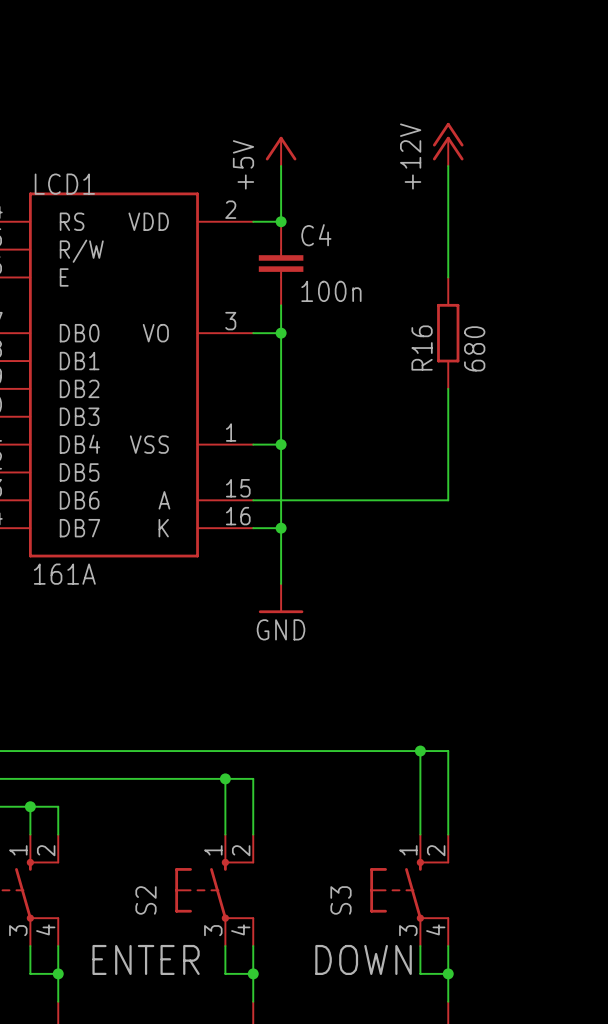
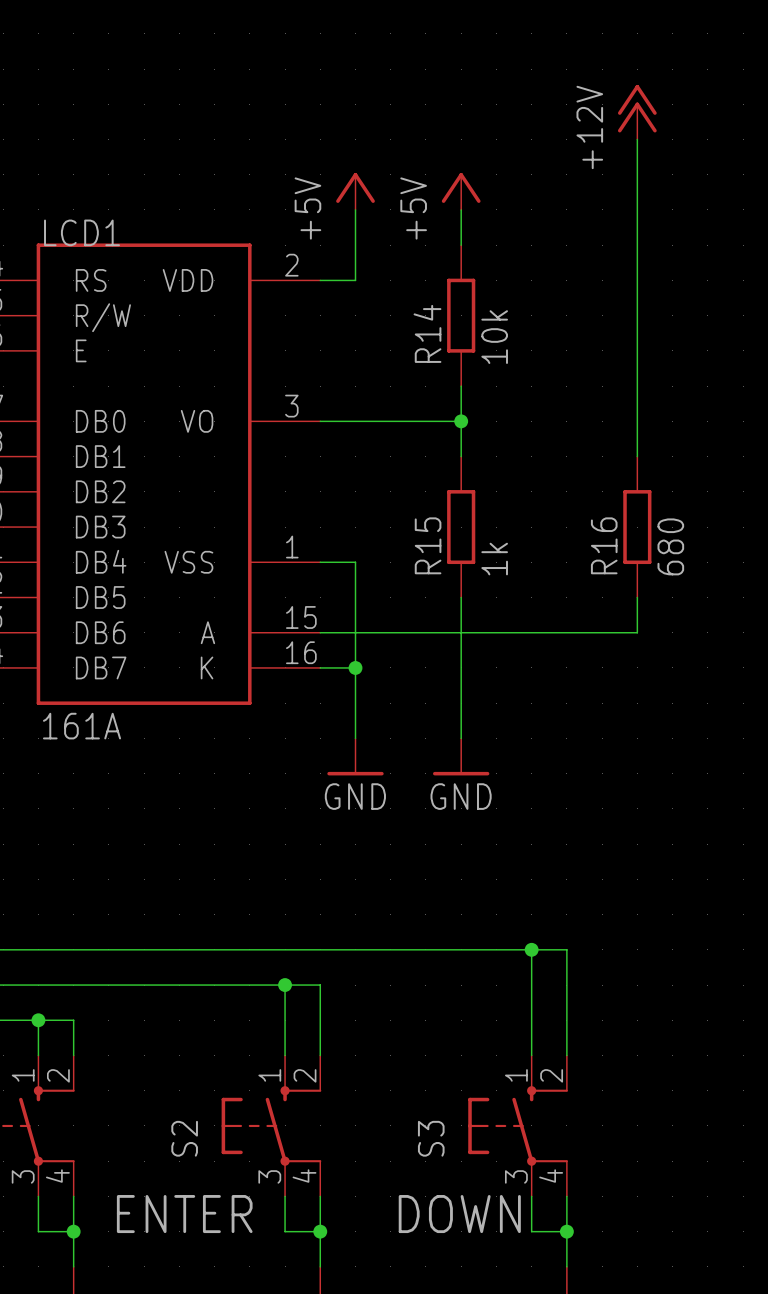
wire: none -> (637, 139) (637, 456)
power symbol position: +12V (448, 144) -> +12V (637, 112)
power symbol: none -> +5V (461, 191)
wire: none -> (461, 209) (461, 245)
wire: (448, 166) (448, 277) -> none
junction: (281, 221) -> none
R14: none -> 10k (461, 315)
C4: 100n (281, 263) -> none
wire: (281, 305) (281, 444) -> none
wire: none -> (461, 386) (461, 456)
wire: none -> (355, 421) (461, 421)
junction: (281, 333) -> none
junction: none -> (461, 421)
R16 position: (448, 333) -> (637, 527)
wire: (448, 388) (448, 500) -> (637, 597) (637, 632) (566, 632)
R15: none -> 1k (461, 527)
junction: (281, 444) -> none
wire: none -> (461, 597) (461, 738)
power symbol: none -> GND (461, 756)

